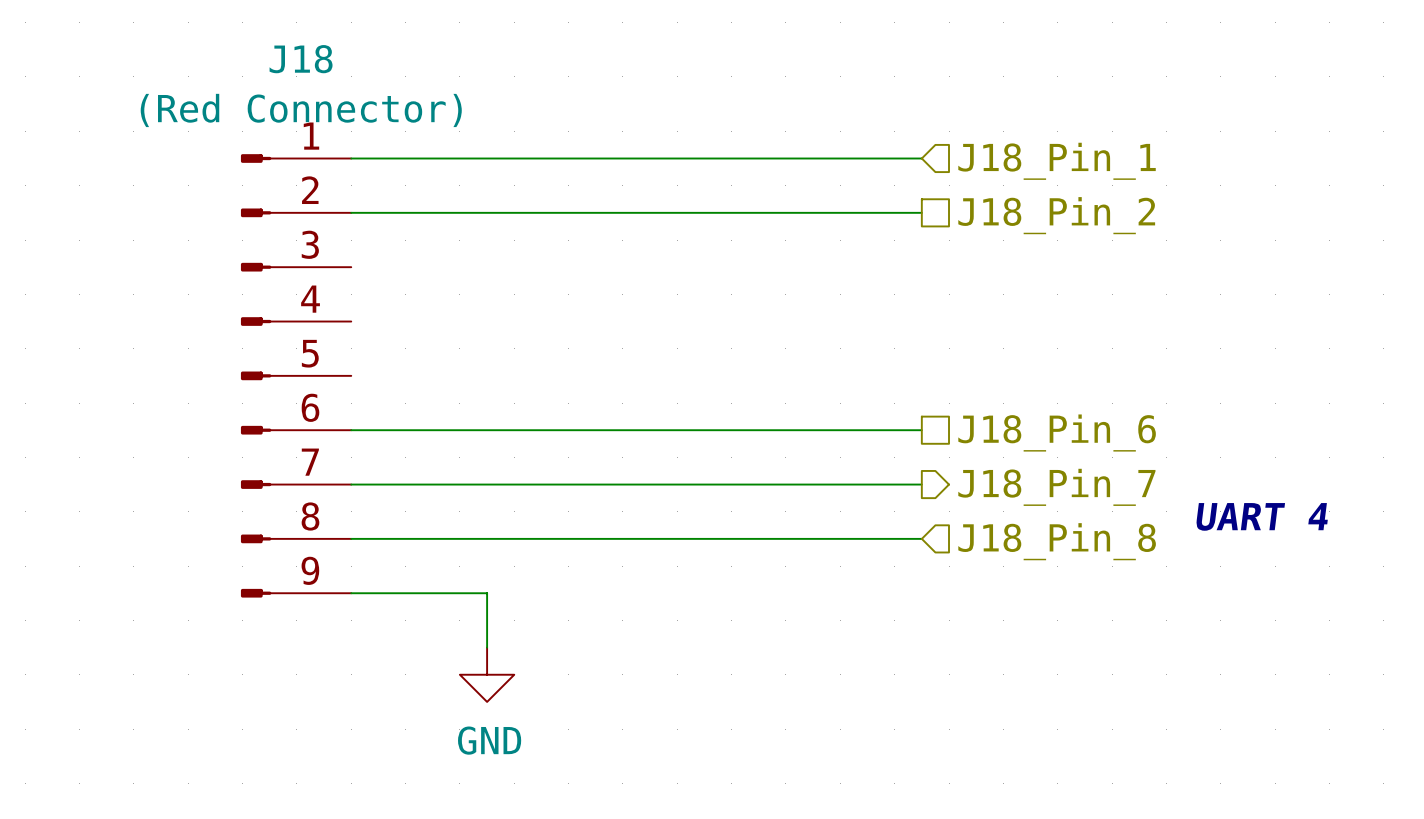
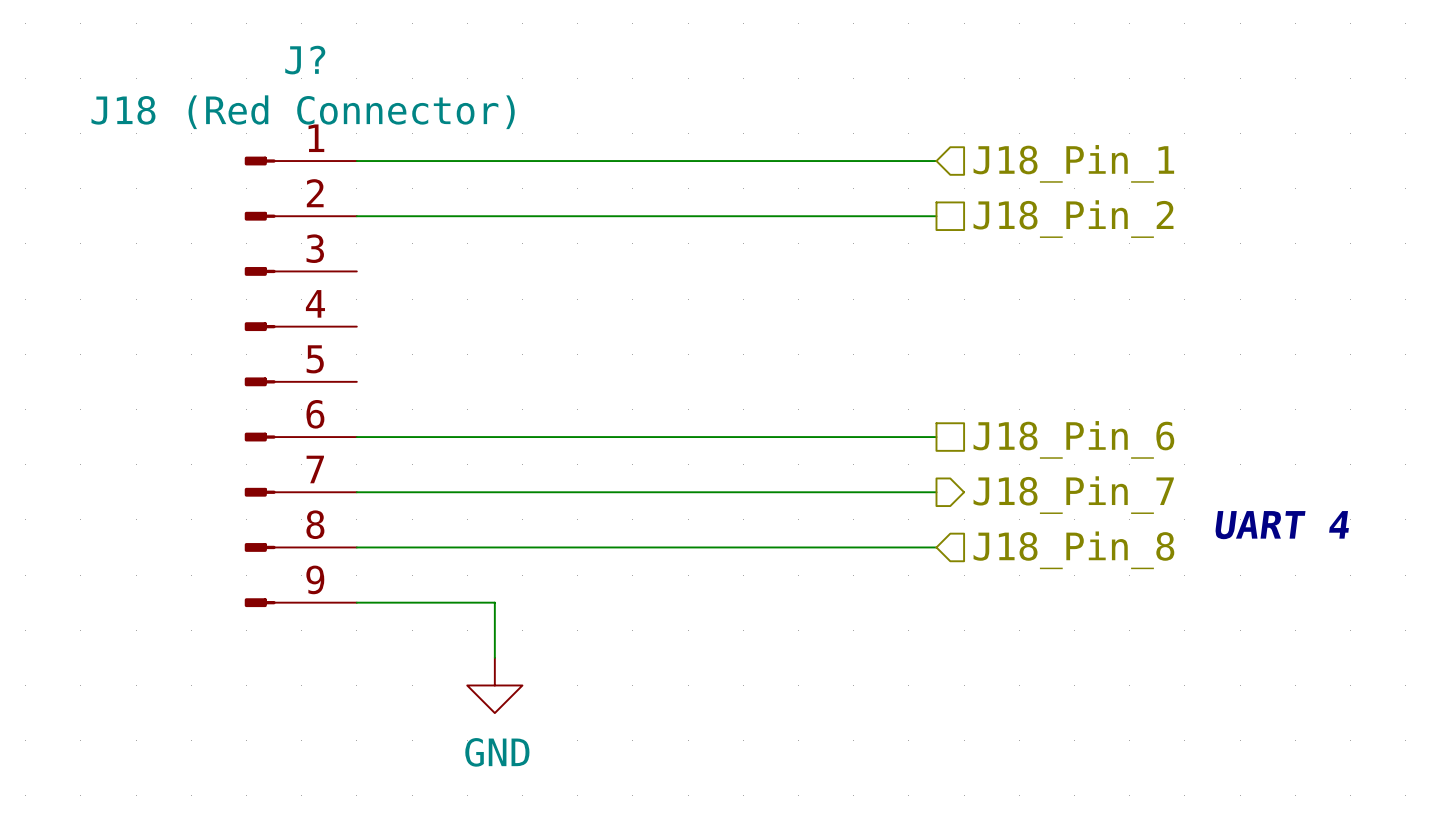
J18 name: J18 (301, 59) -> J? (305, 60)
J18 value: (Red Connector) (301, 110) -> J18 (Red Connector) (303, 112)

